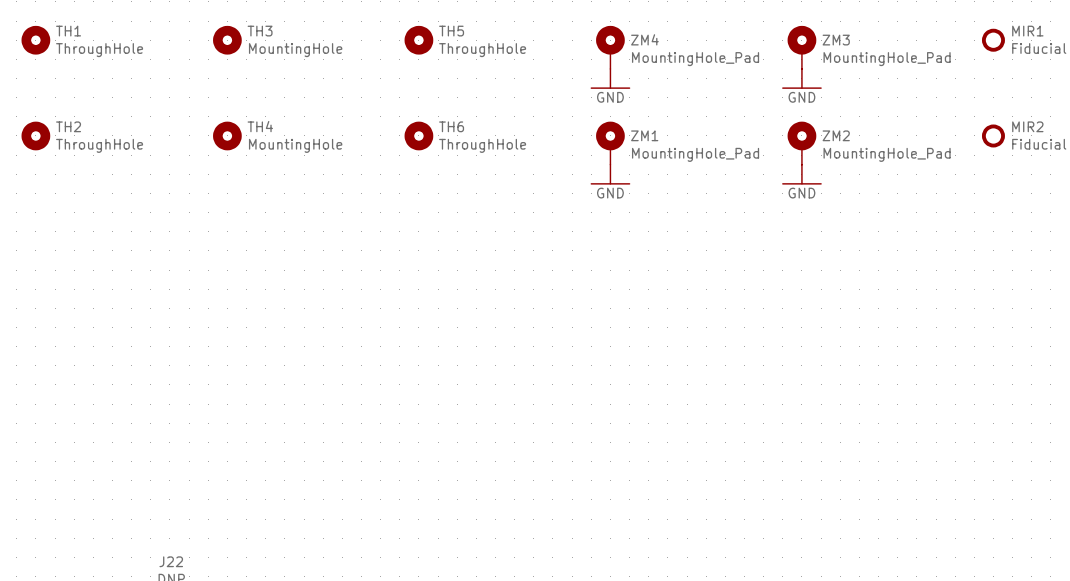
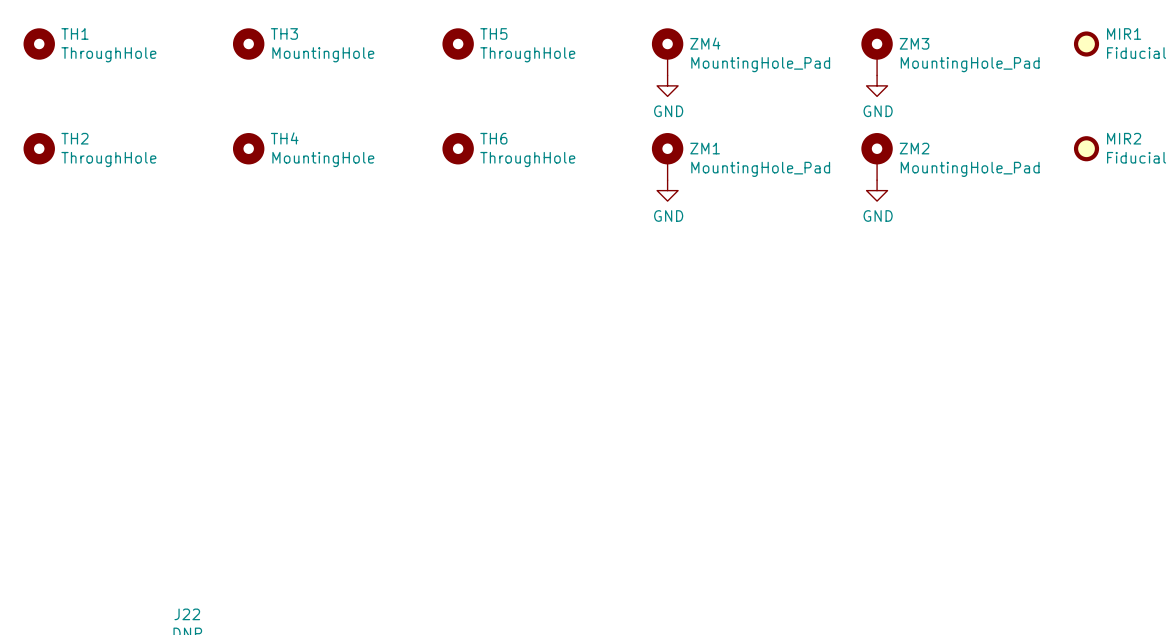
power symbol shape: [591, 68, 630, 89] -> [657, 75, 679, 97]
power symbol shape: [782, 68, 822, 89] -> [866, 75, 888, 97]
power symbol shape: [591, 164, 630, 184] -> [657, 180, 679, 202]
power symbol shape: [782, 164, 822, 184] -> [866, 180, 888, 202]

